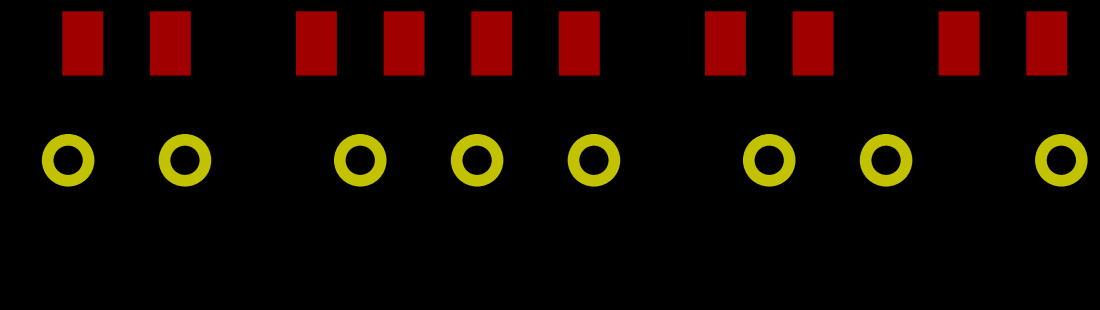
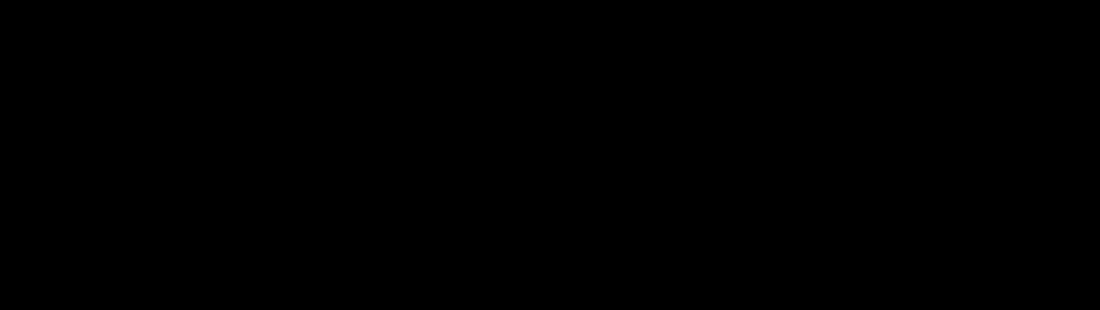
part: (126, 43) -> none
part: (360, 43) -> none
part: (535, 43) -> none
part: (769, 43) -> none
part: (1002, 43) -> none
part: (68, 160) -> none
part: (184, 160) -> none
part: (360, 160) -> none
part: (477, 160) -> none
part: (593, 160) -> none
part: (769, 160) -> none
part: (886, 160) -> none
part: (1061, 160) -> none

